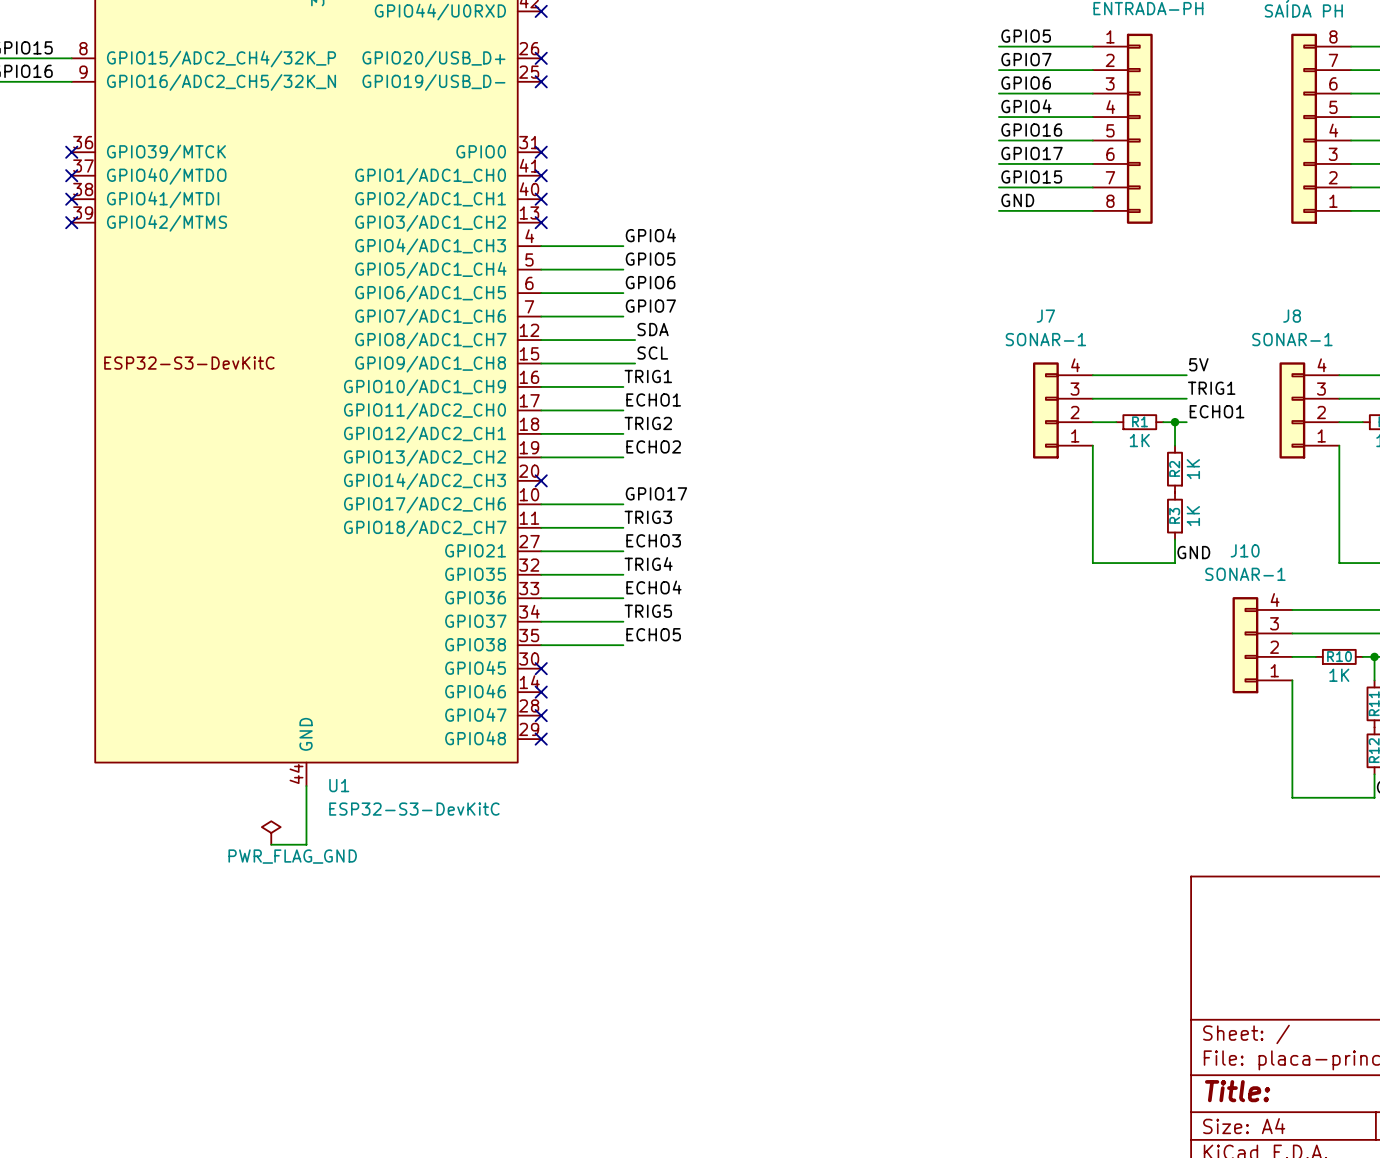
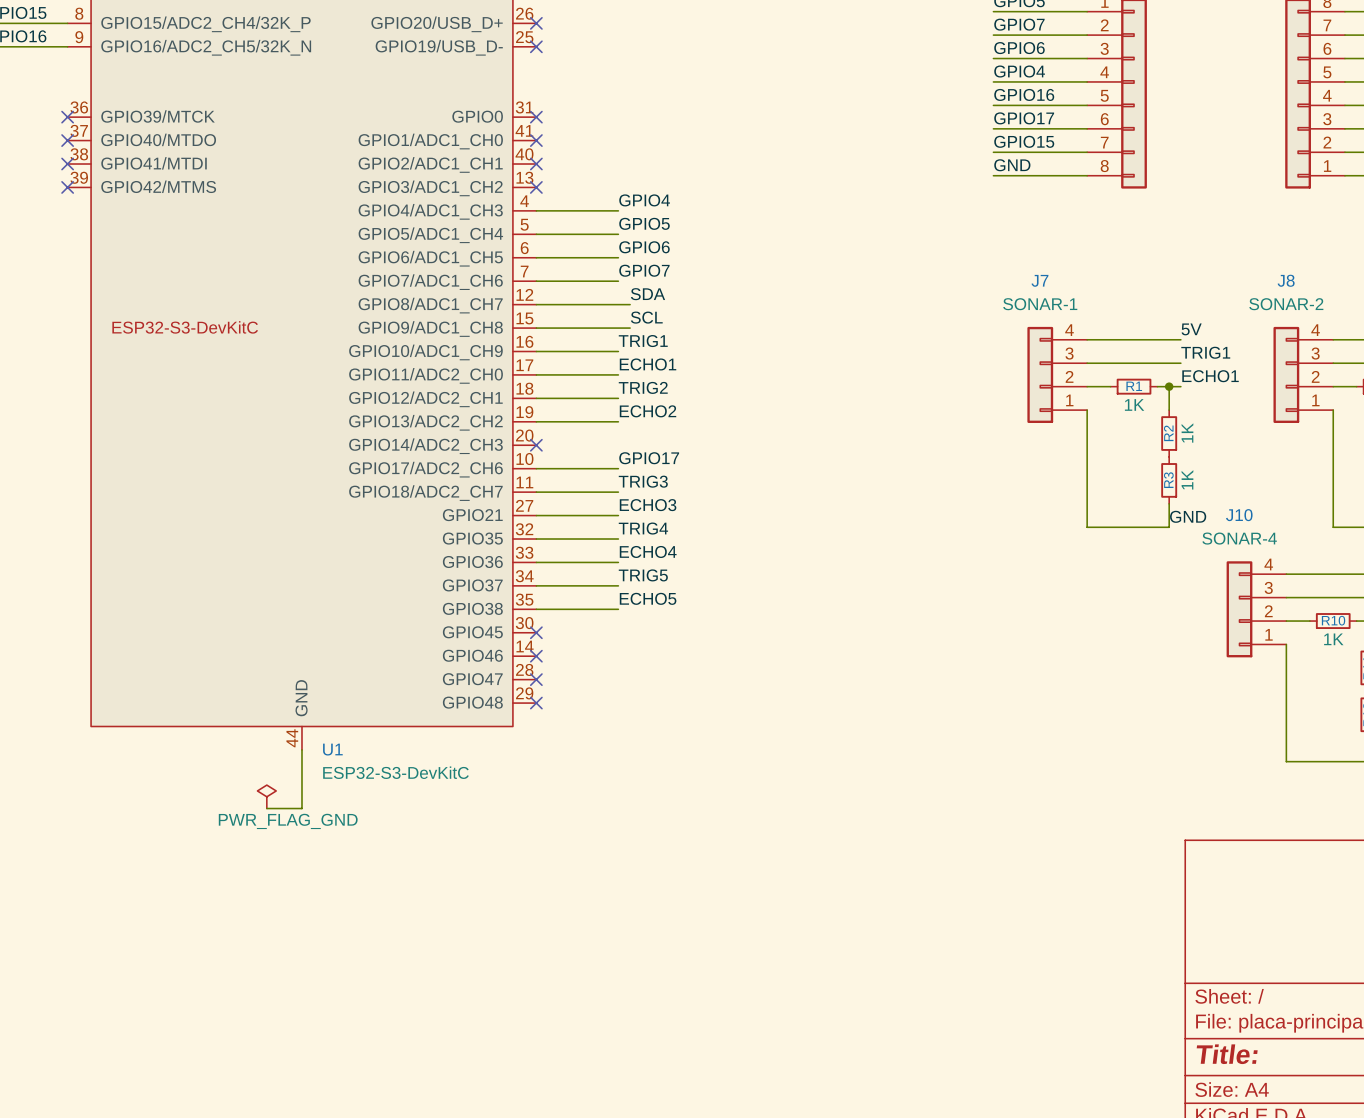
J8 value: SONAR-1 (1292, 339) -> SONAR-2 (1286, 304)
J10 value: SONAR-1 (1245, 574) -> SONAR-4 (1239, 538)

